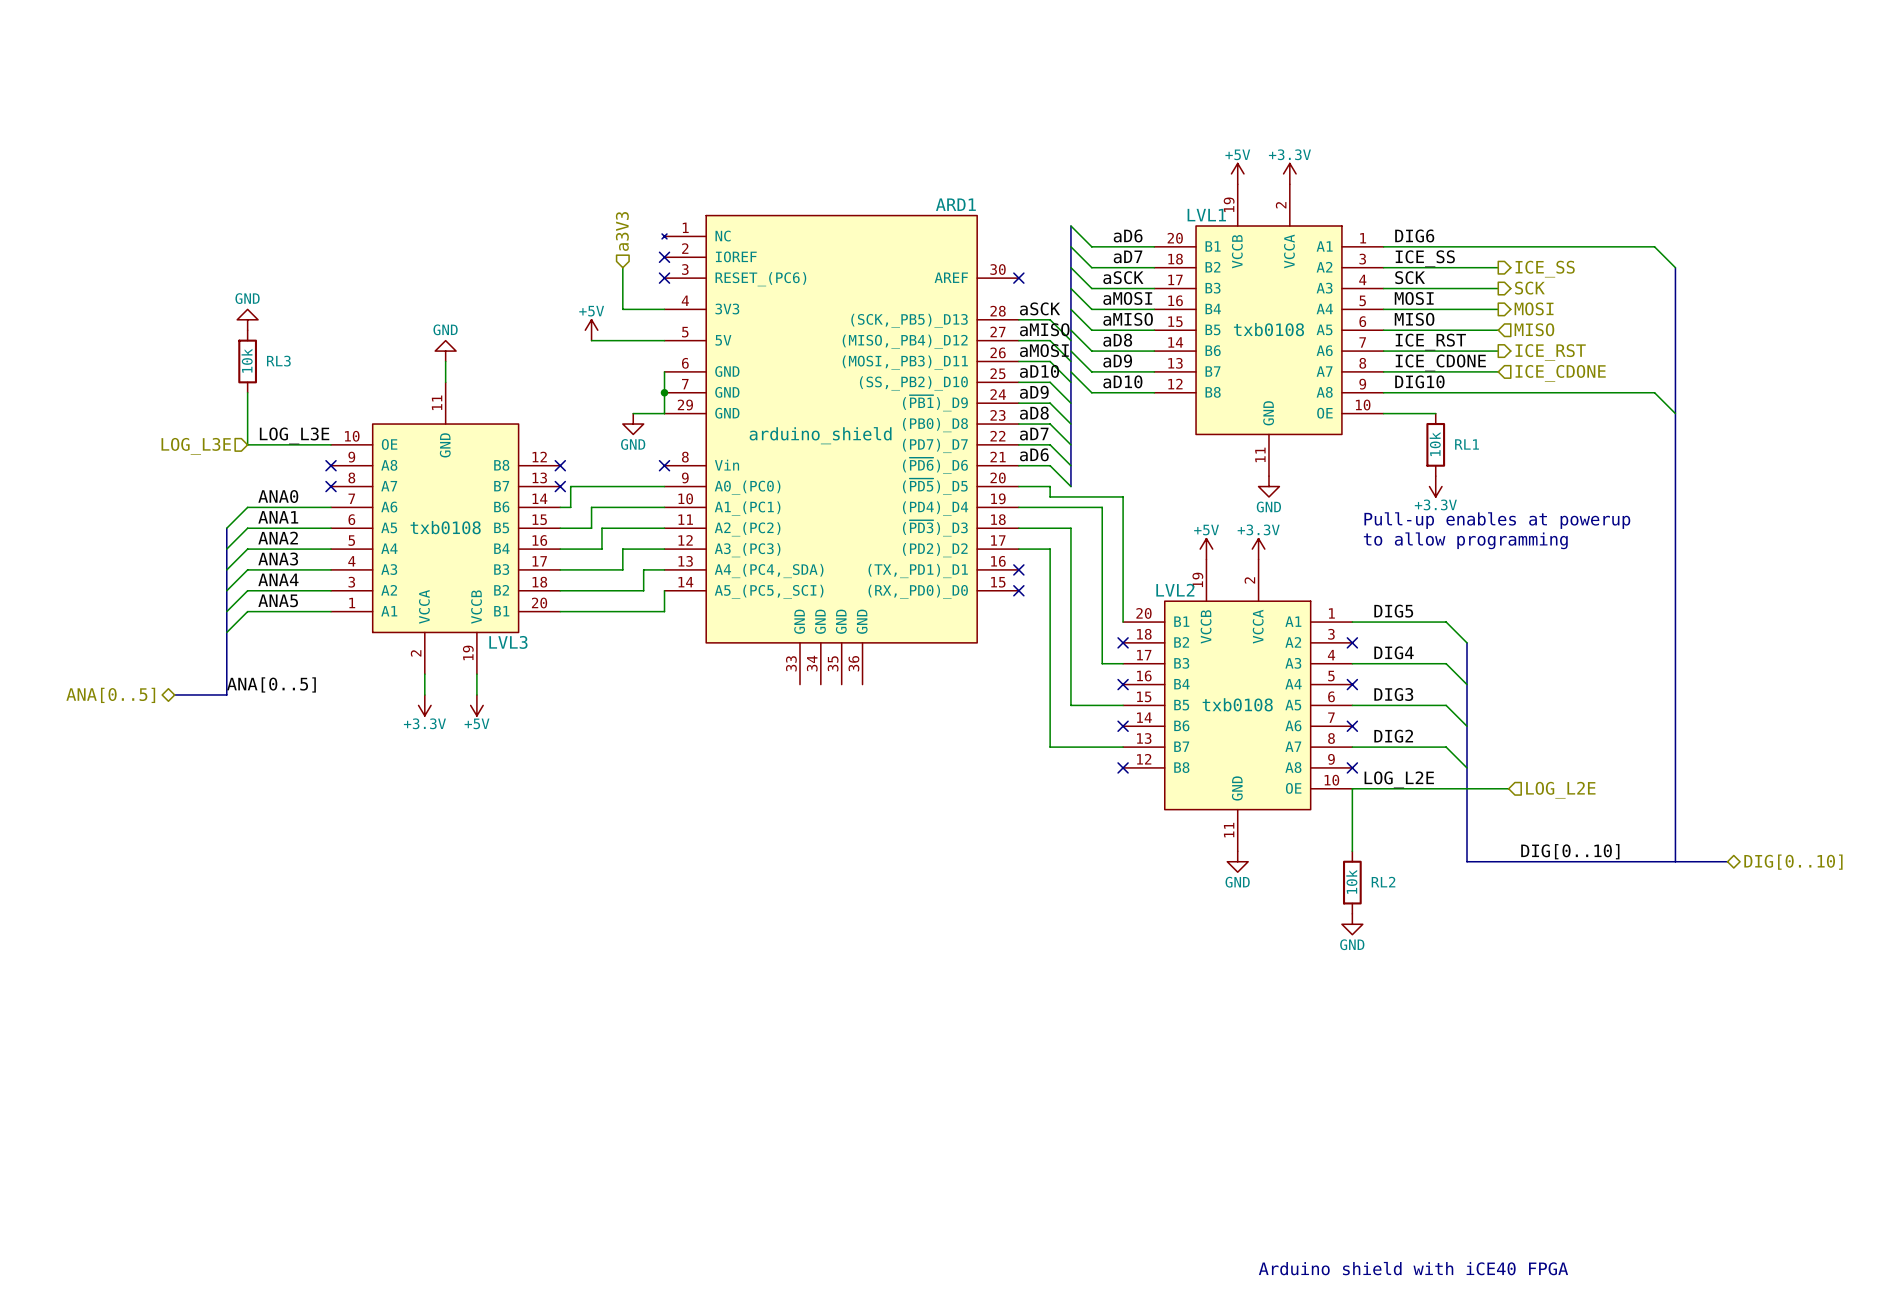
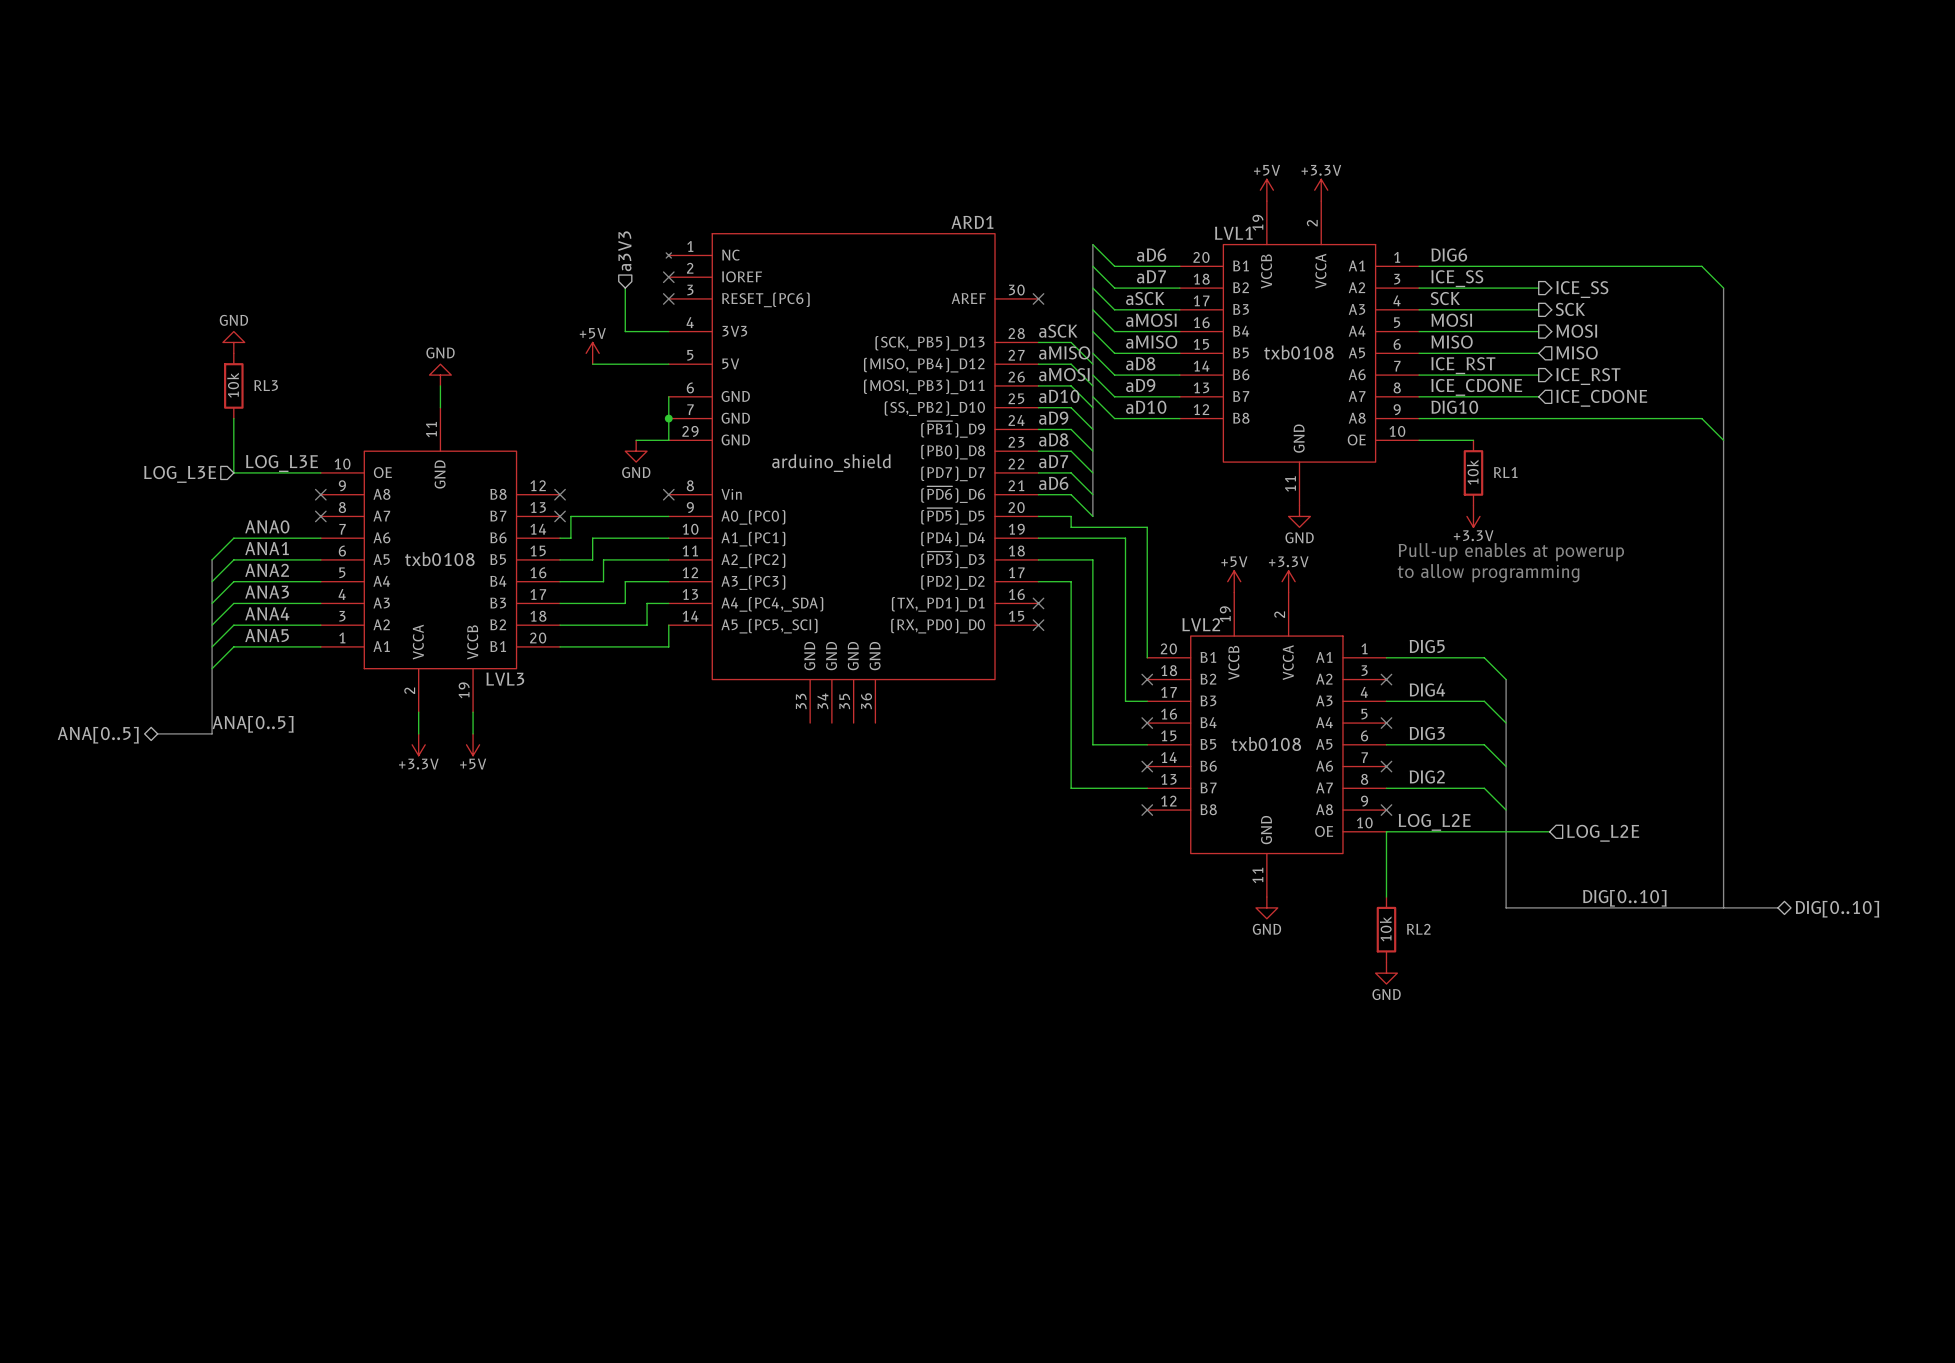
text: Arduino shield with iCE40 FPGA (1413, 1268) -> none

